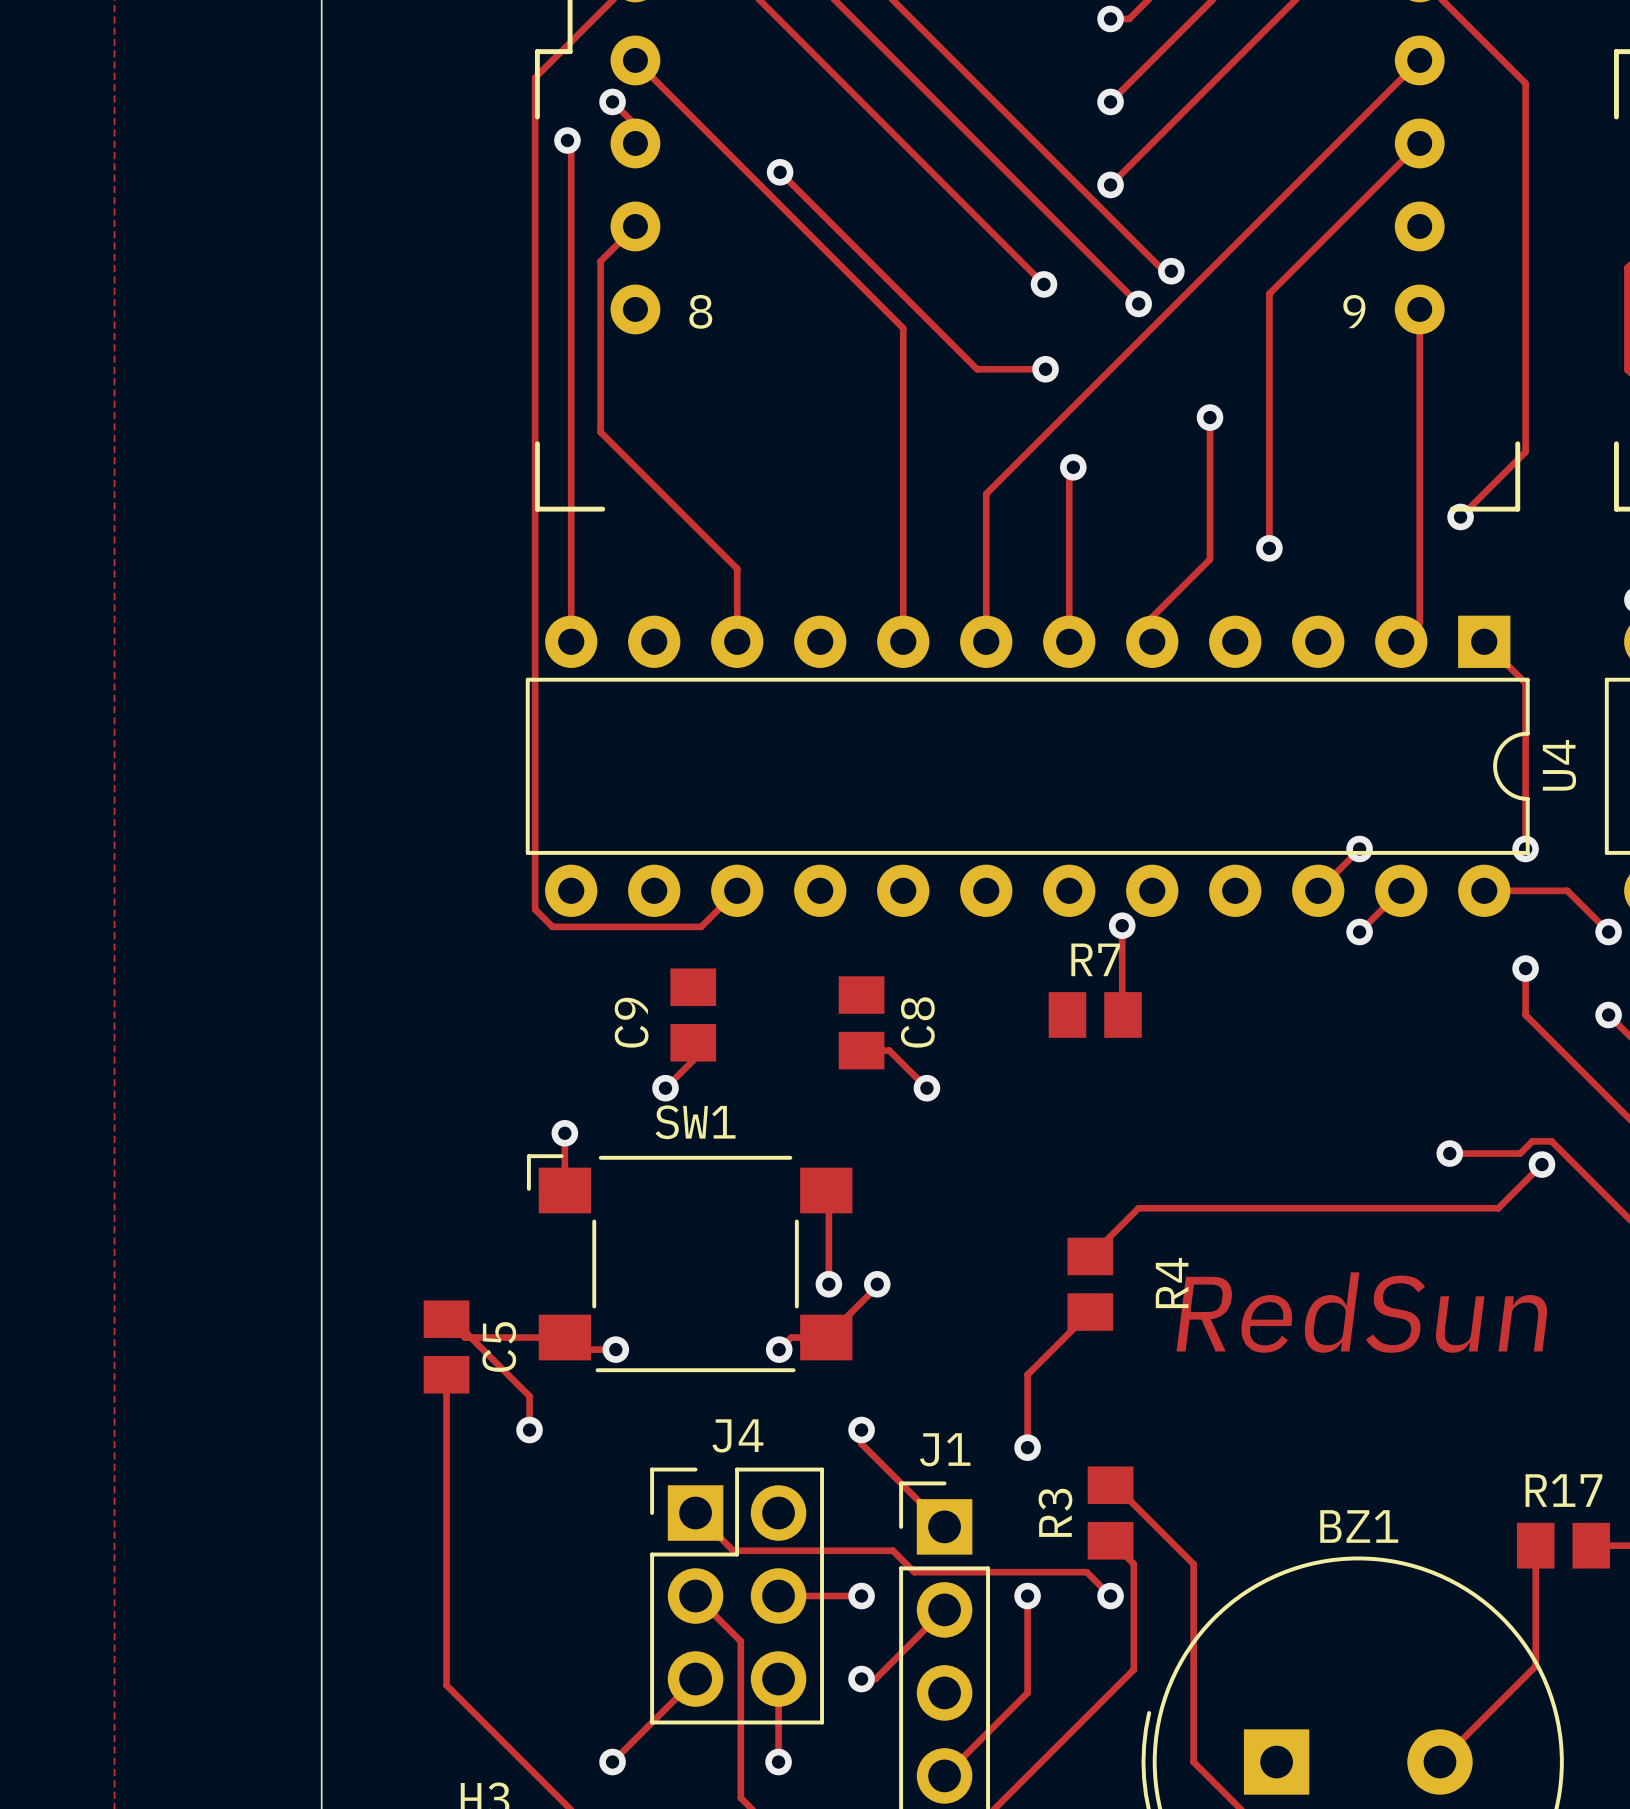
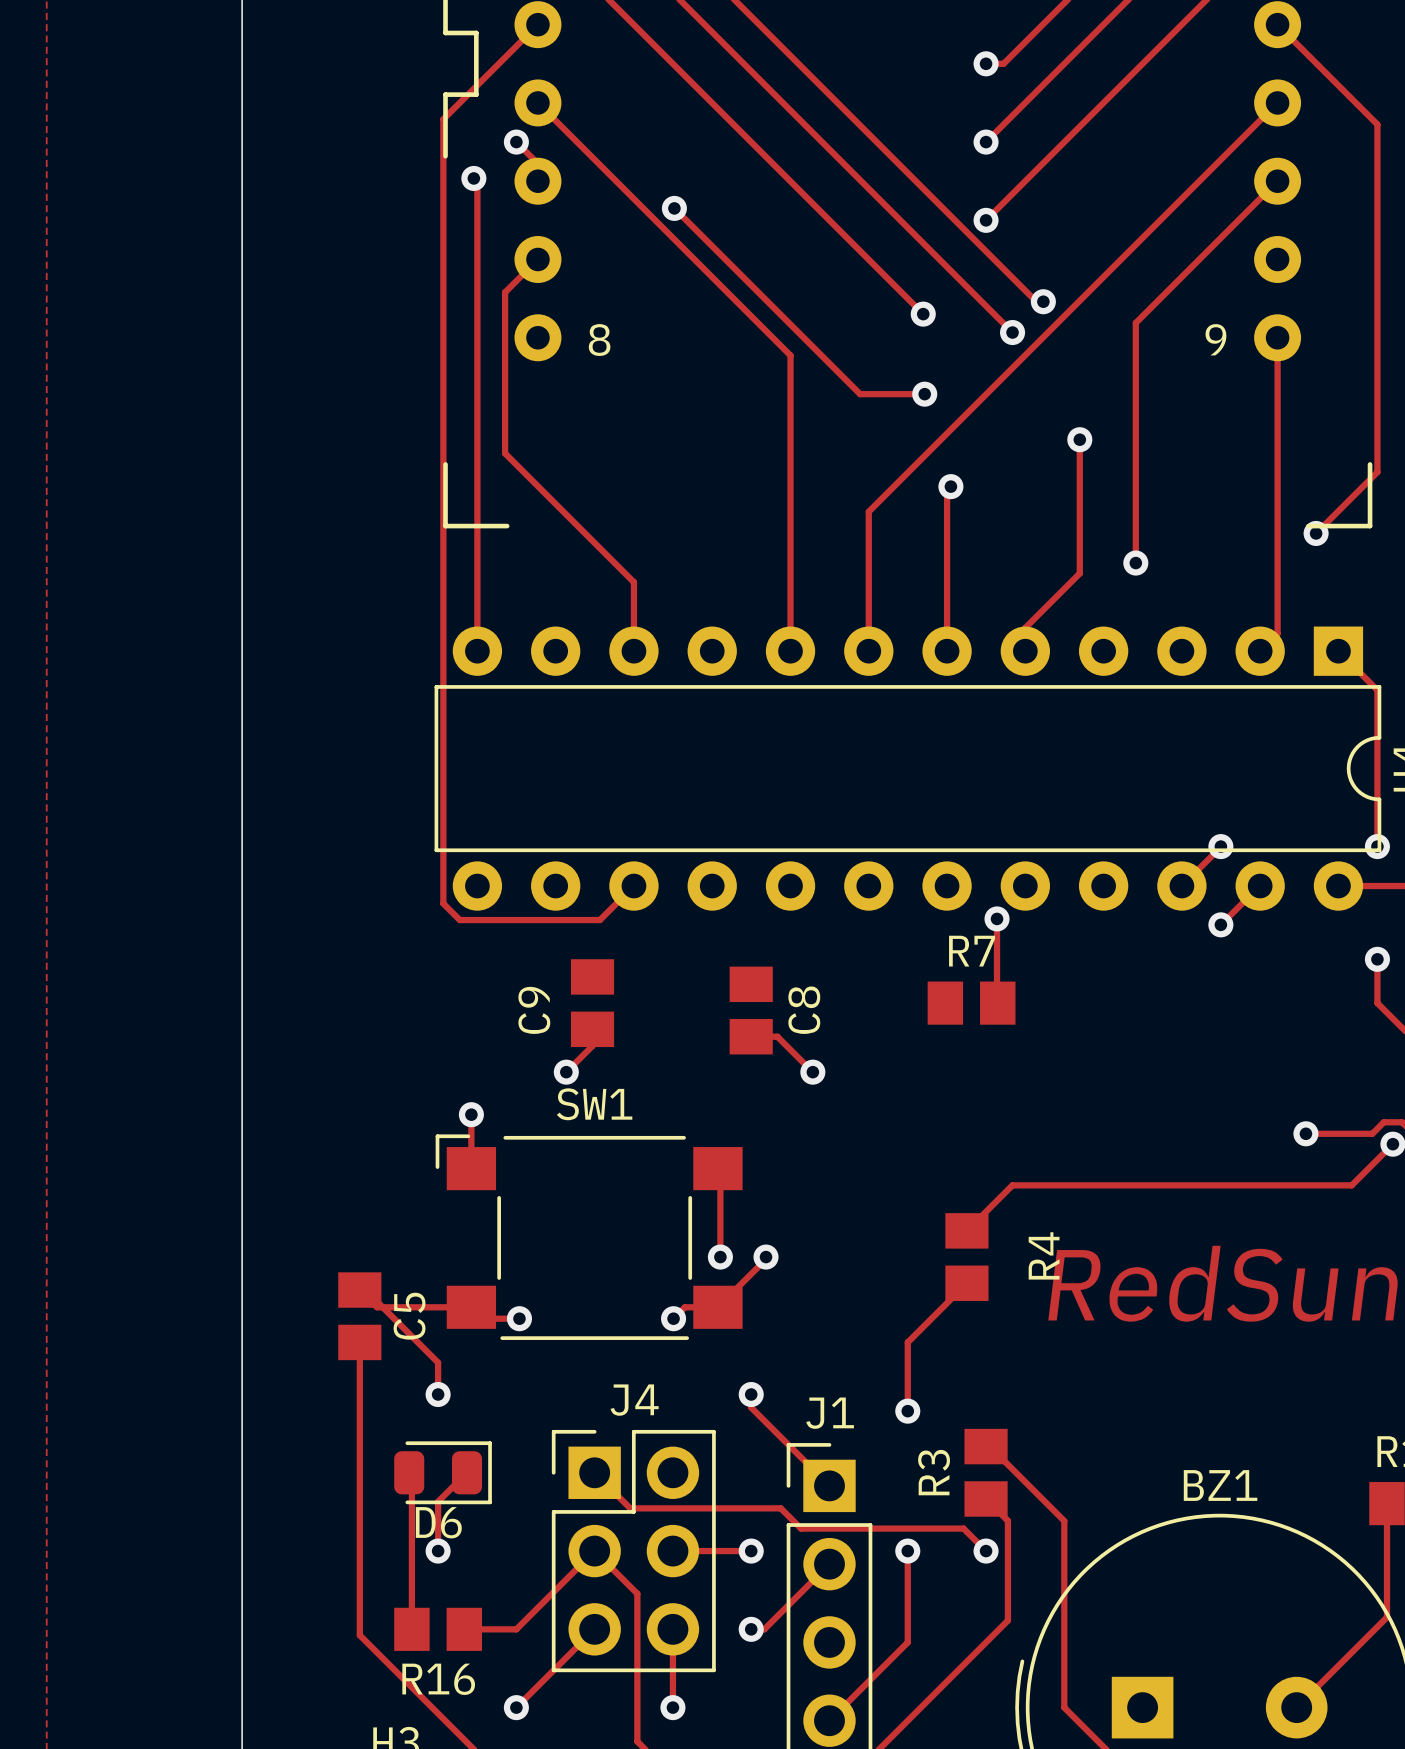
track: none -> (409, 1472) (411, 1475) (411, 1629)
D6: none -> (443, 1472)
track: none -> (467, 1472) (438, 1501) (438, 1551)
via: none -> (438, 1551)
track: none -> (594, 1551) (516, 1629) (464, 1629)
R16: none -> (438, 1629)

